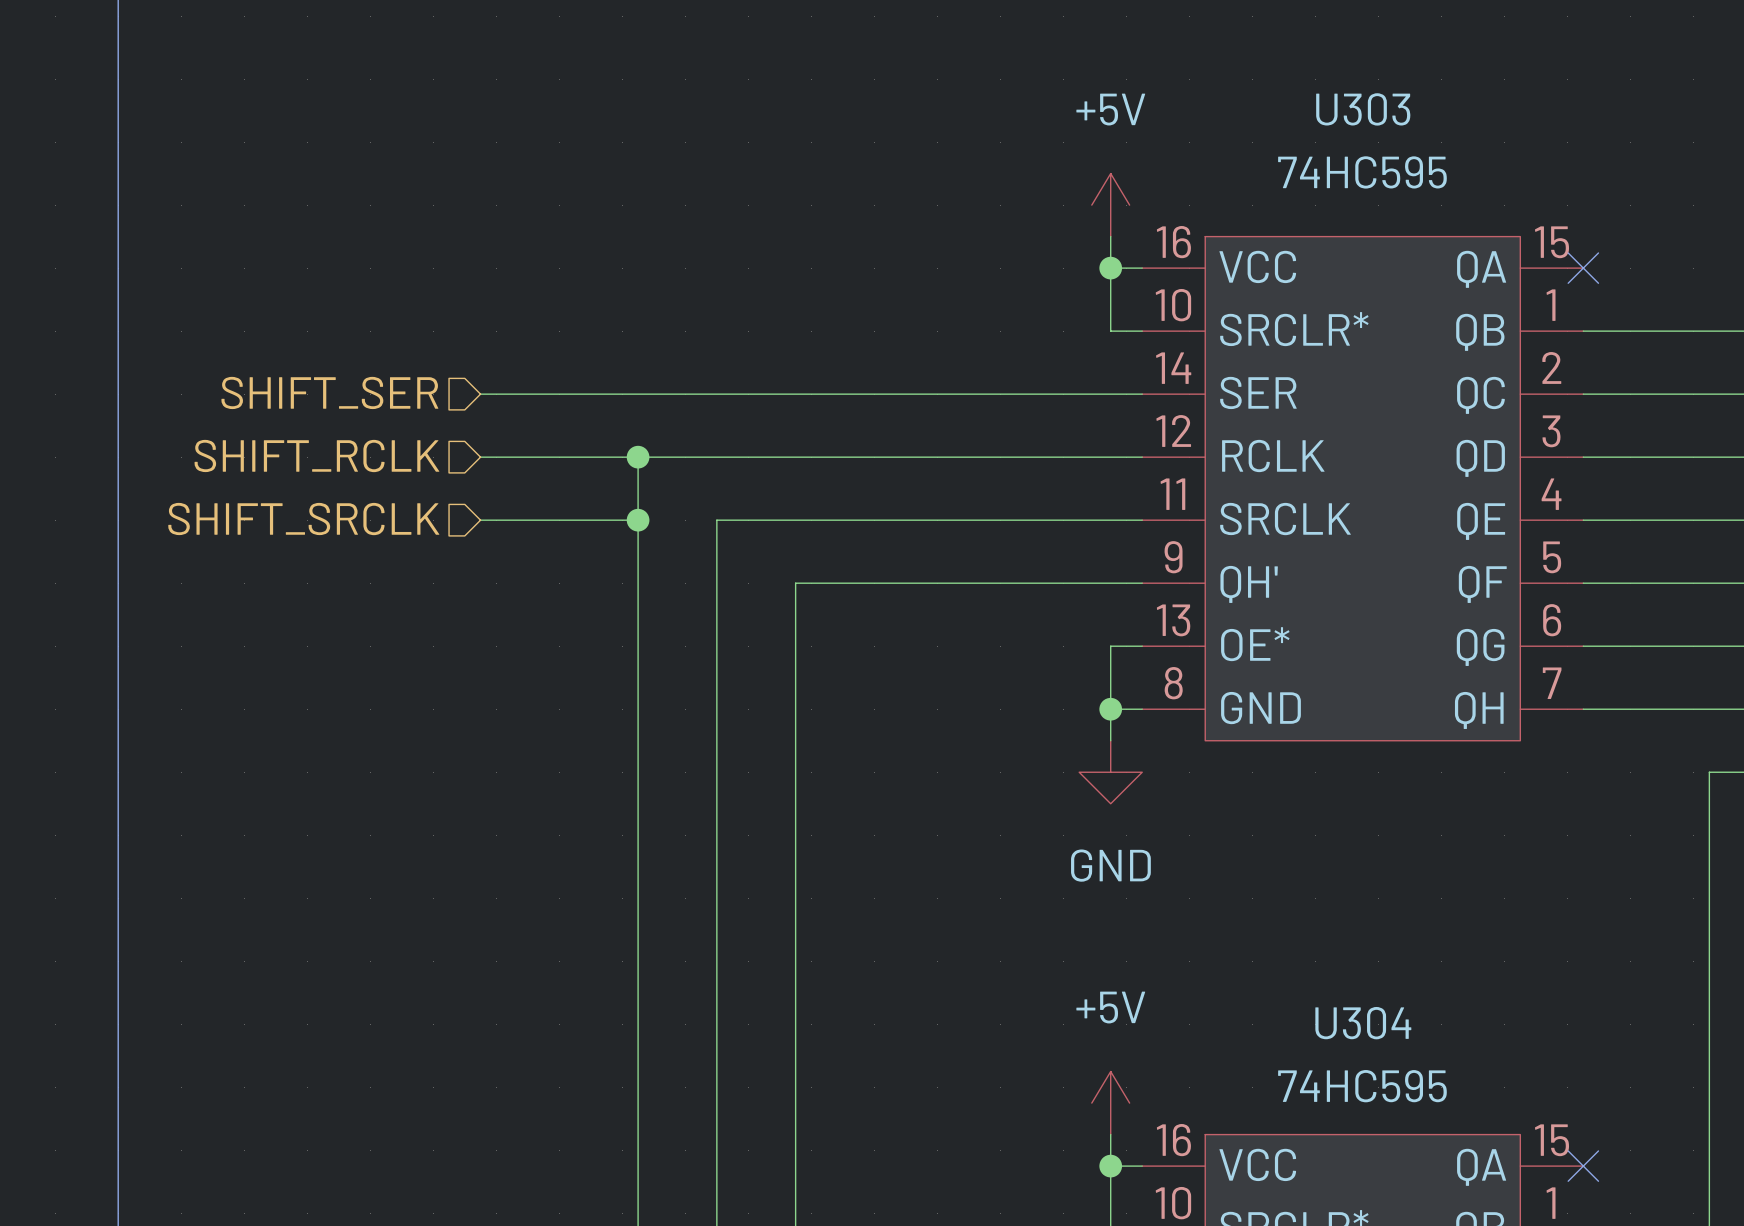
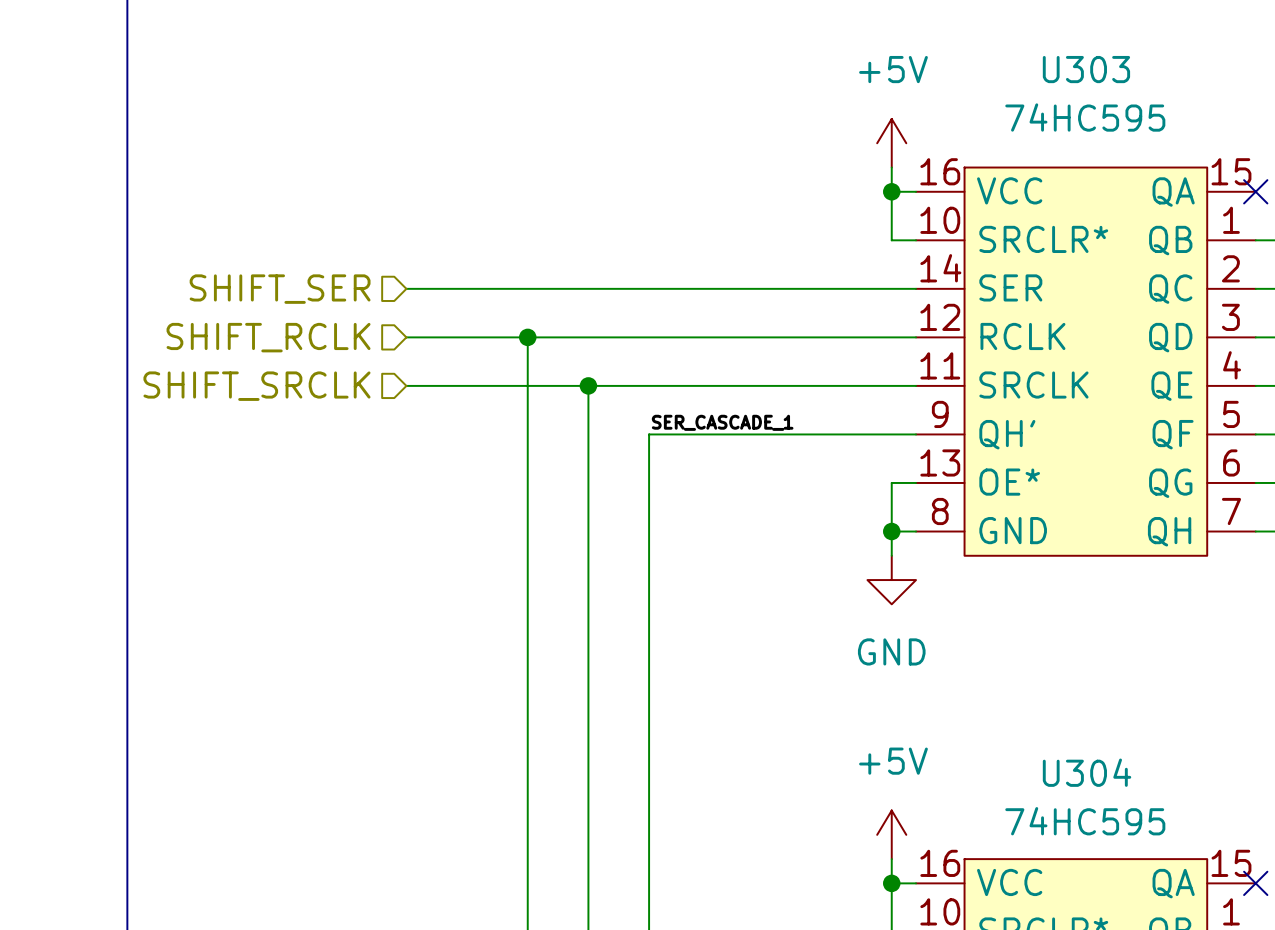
wire: none -> (527, 385) (588, 385)
junction position: (638, 520) -> (588, 385)
label: none -> SER_CASCADE_1 (722, 422)

